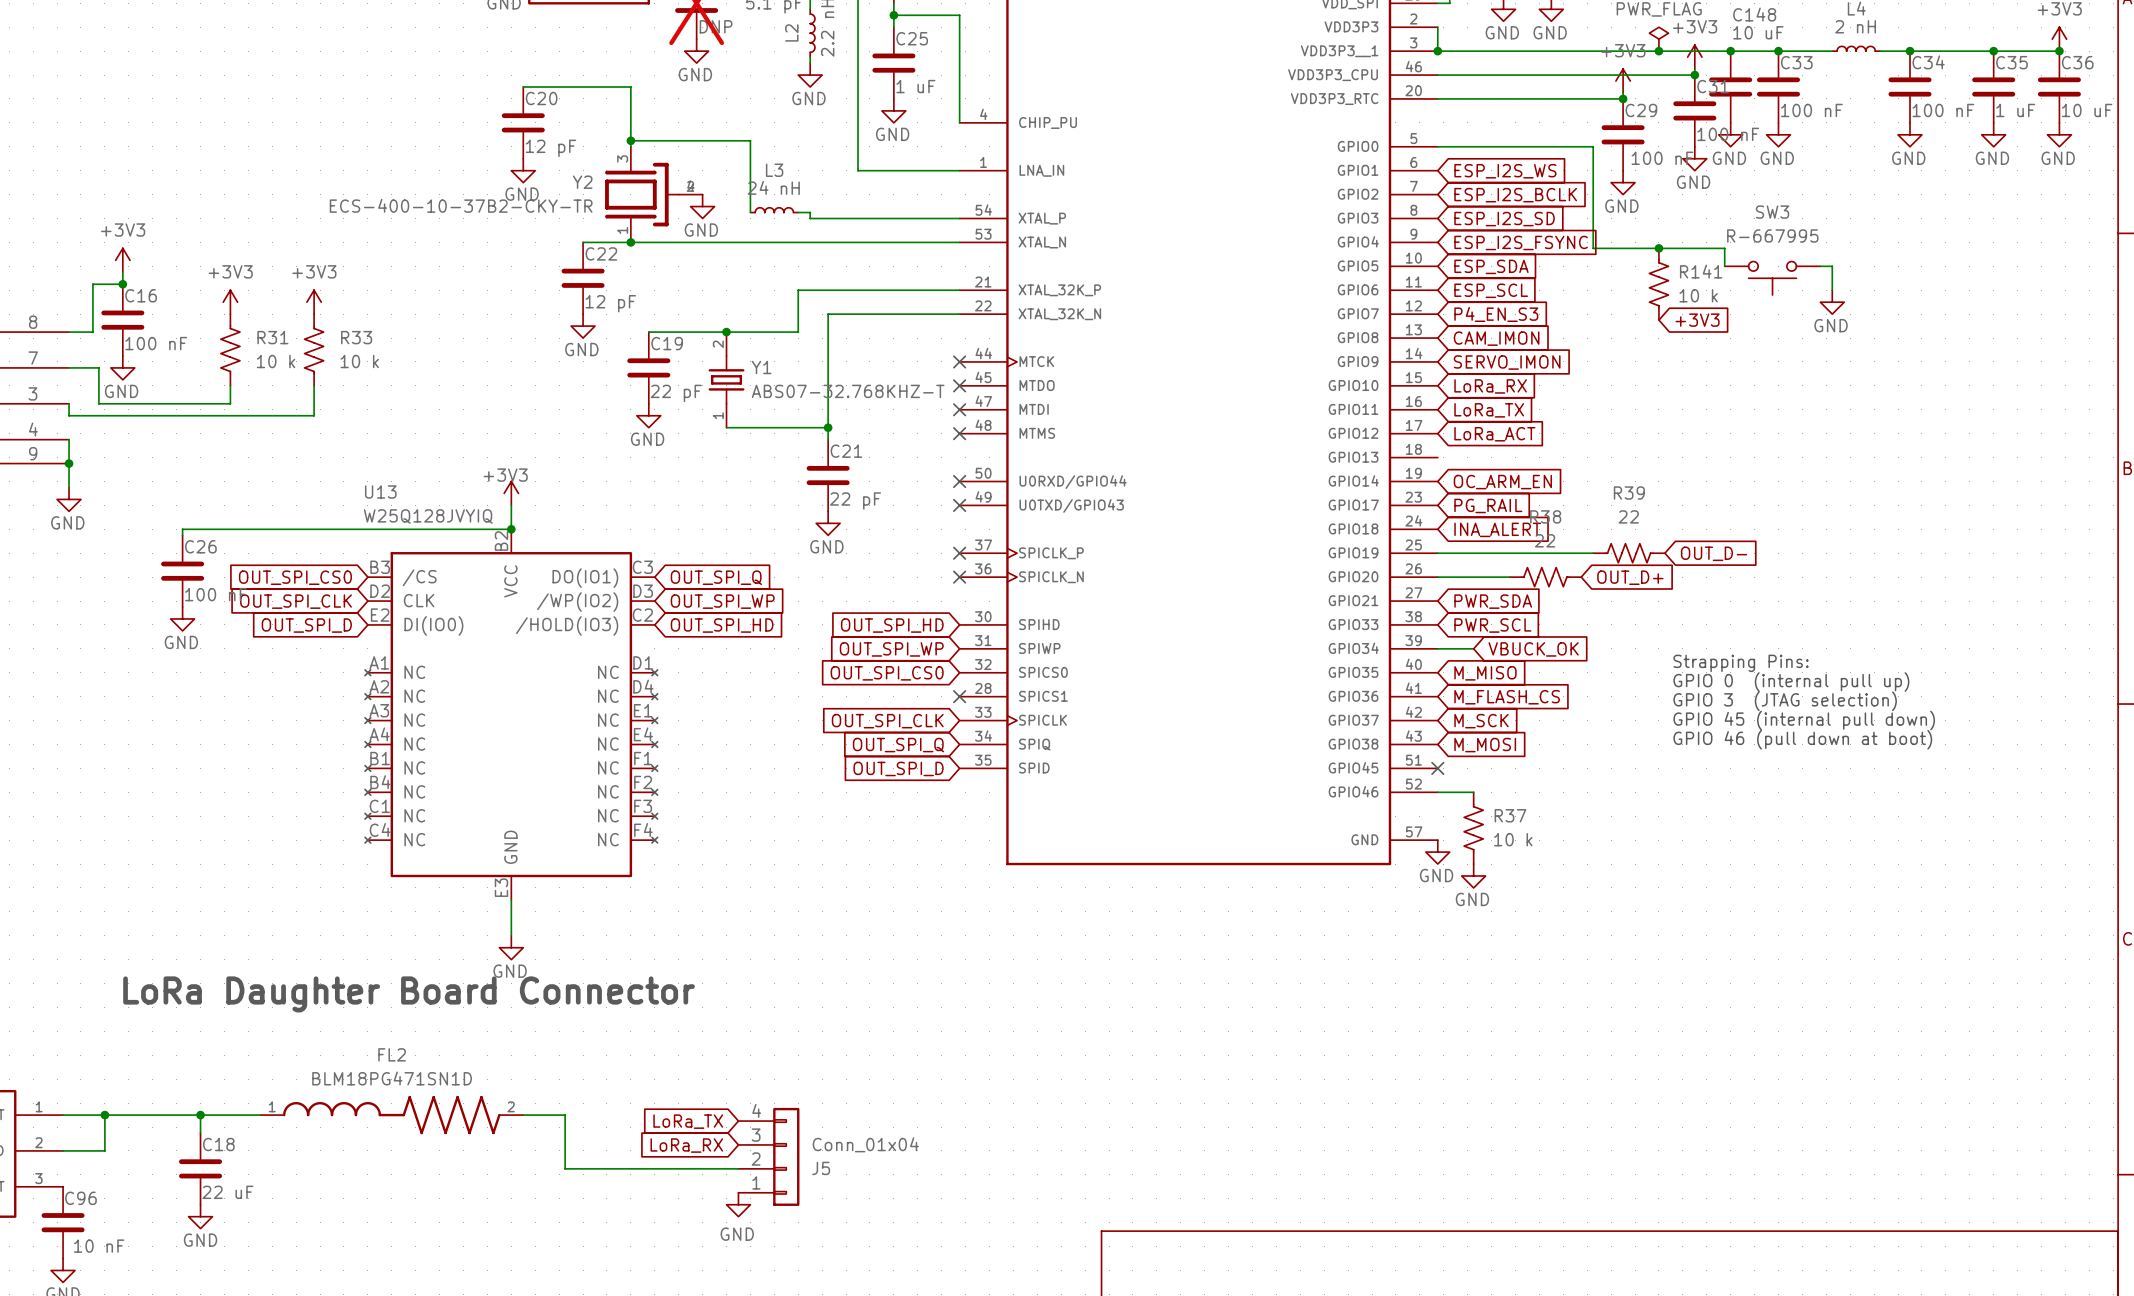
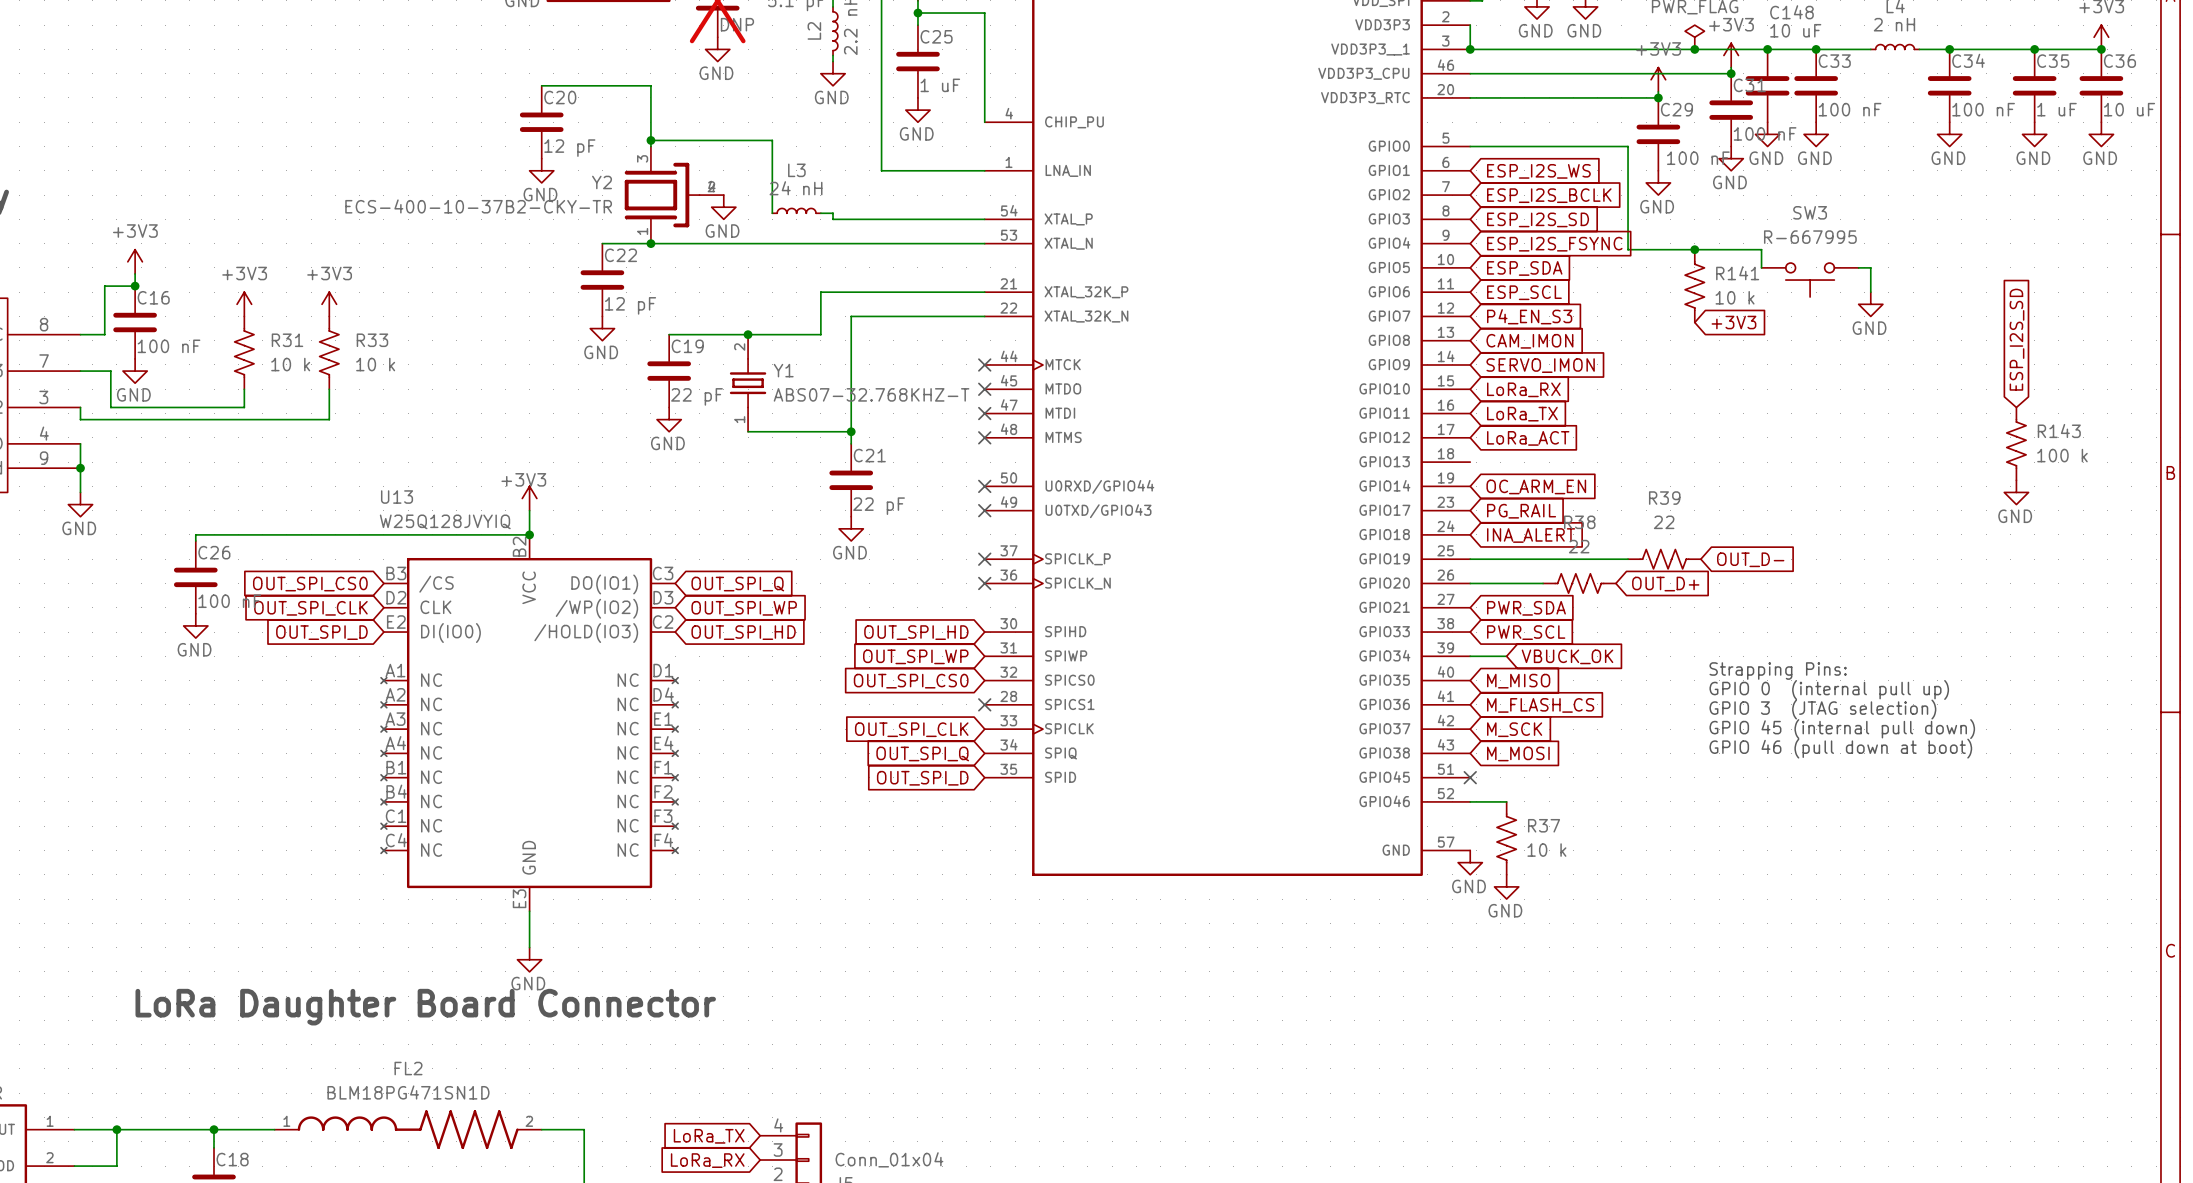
global label: none -> ESP_I2S_SD (2017, 339)
R143: none -> 100 k (2016, 443)
power symbol: none -> GND (2016, 492)

